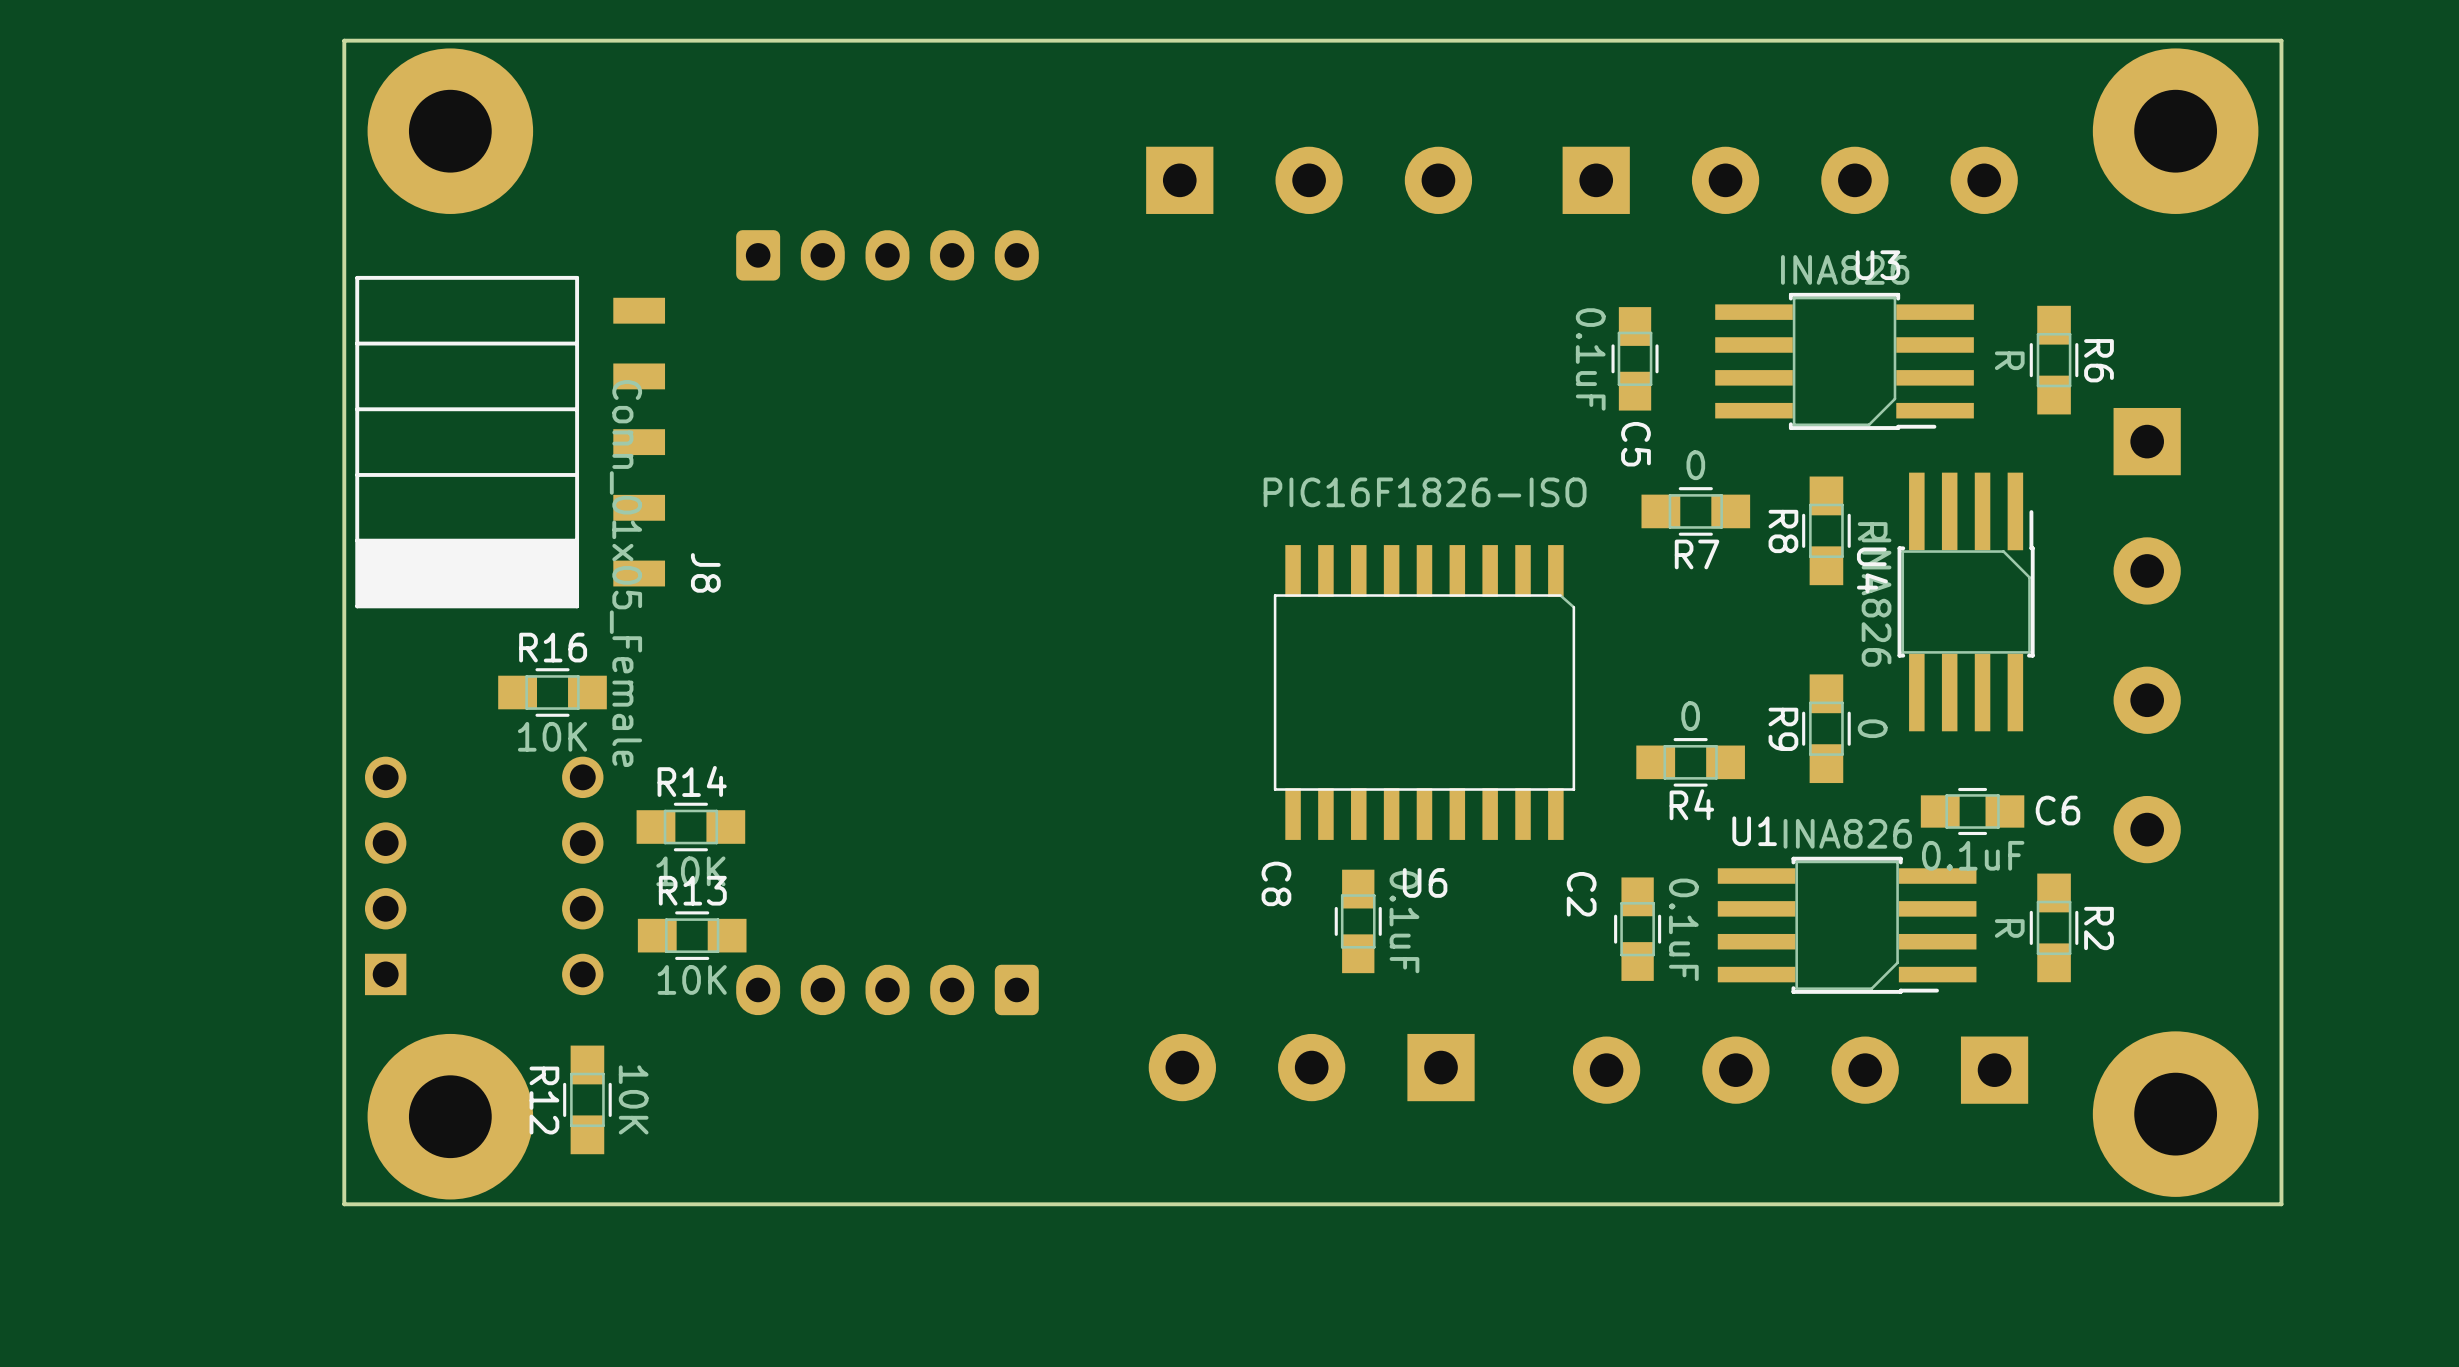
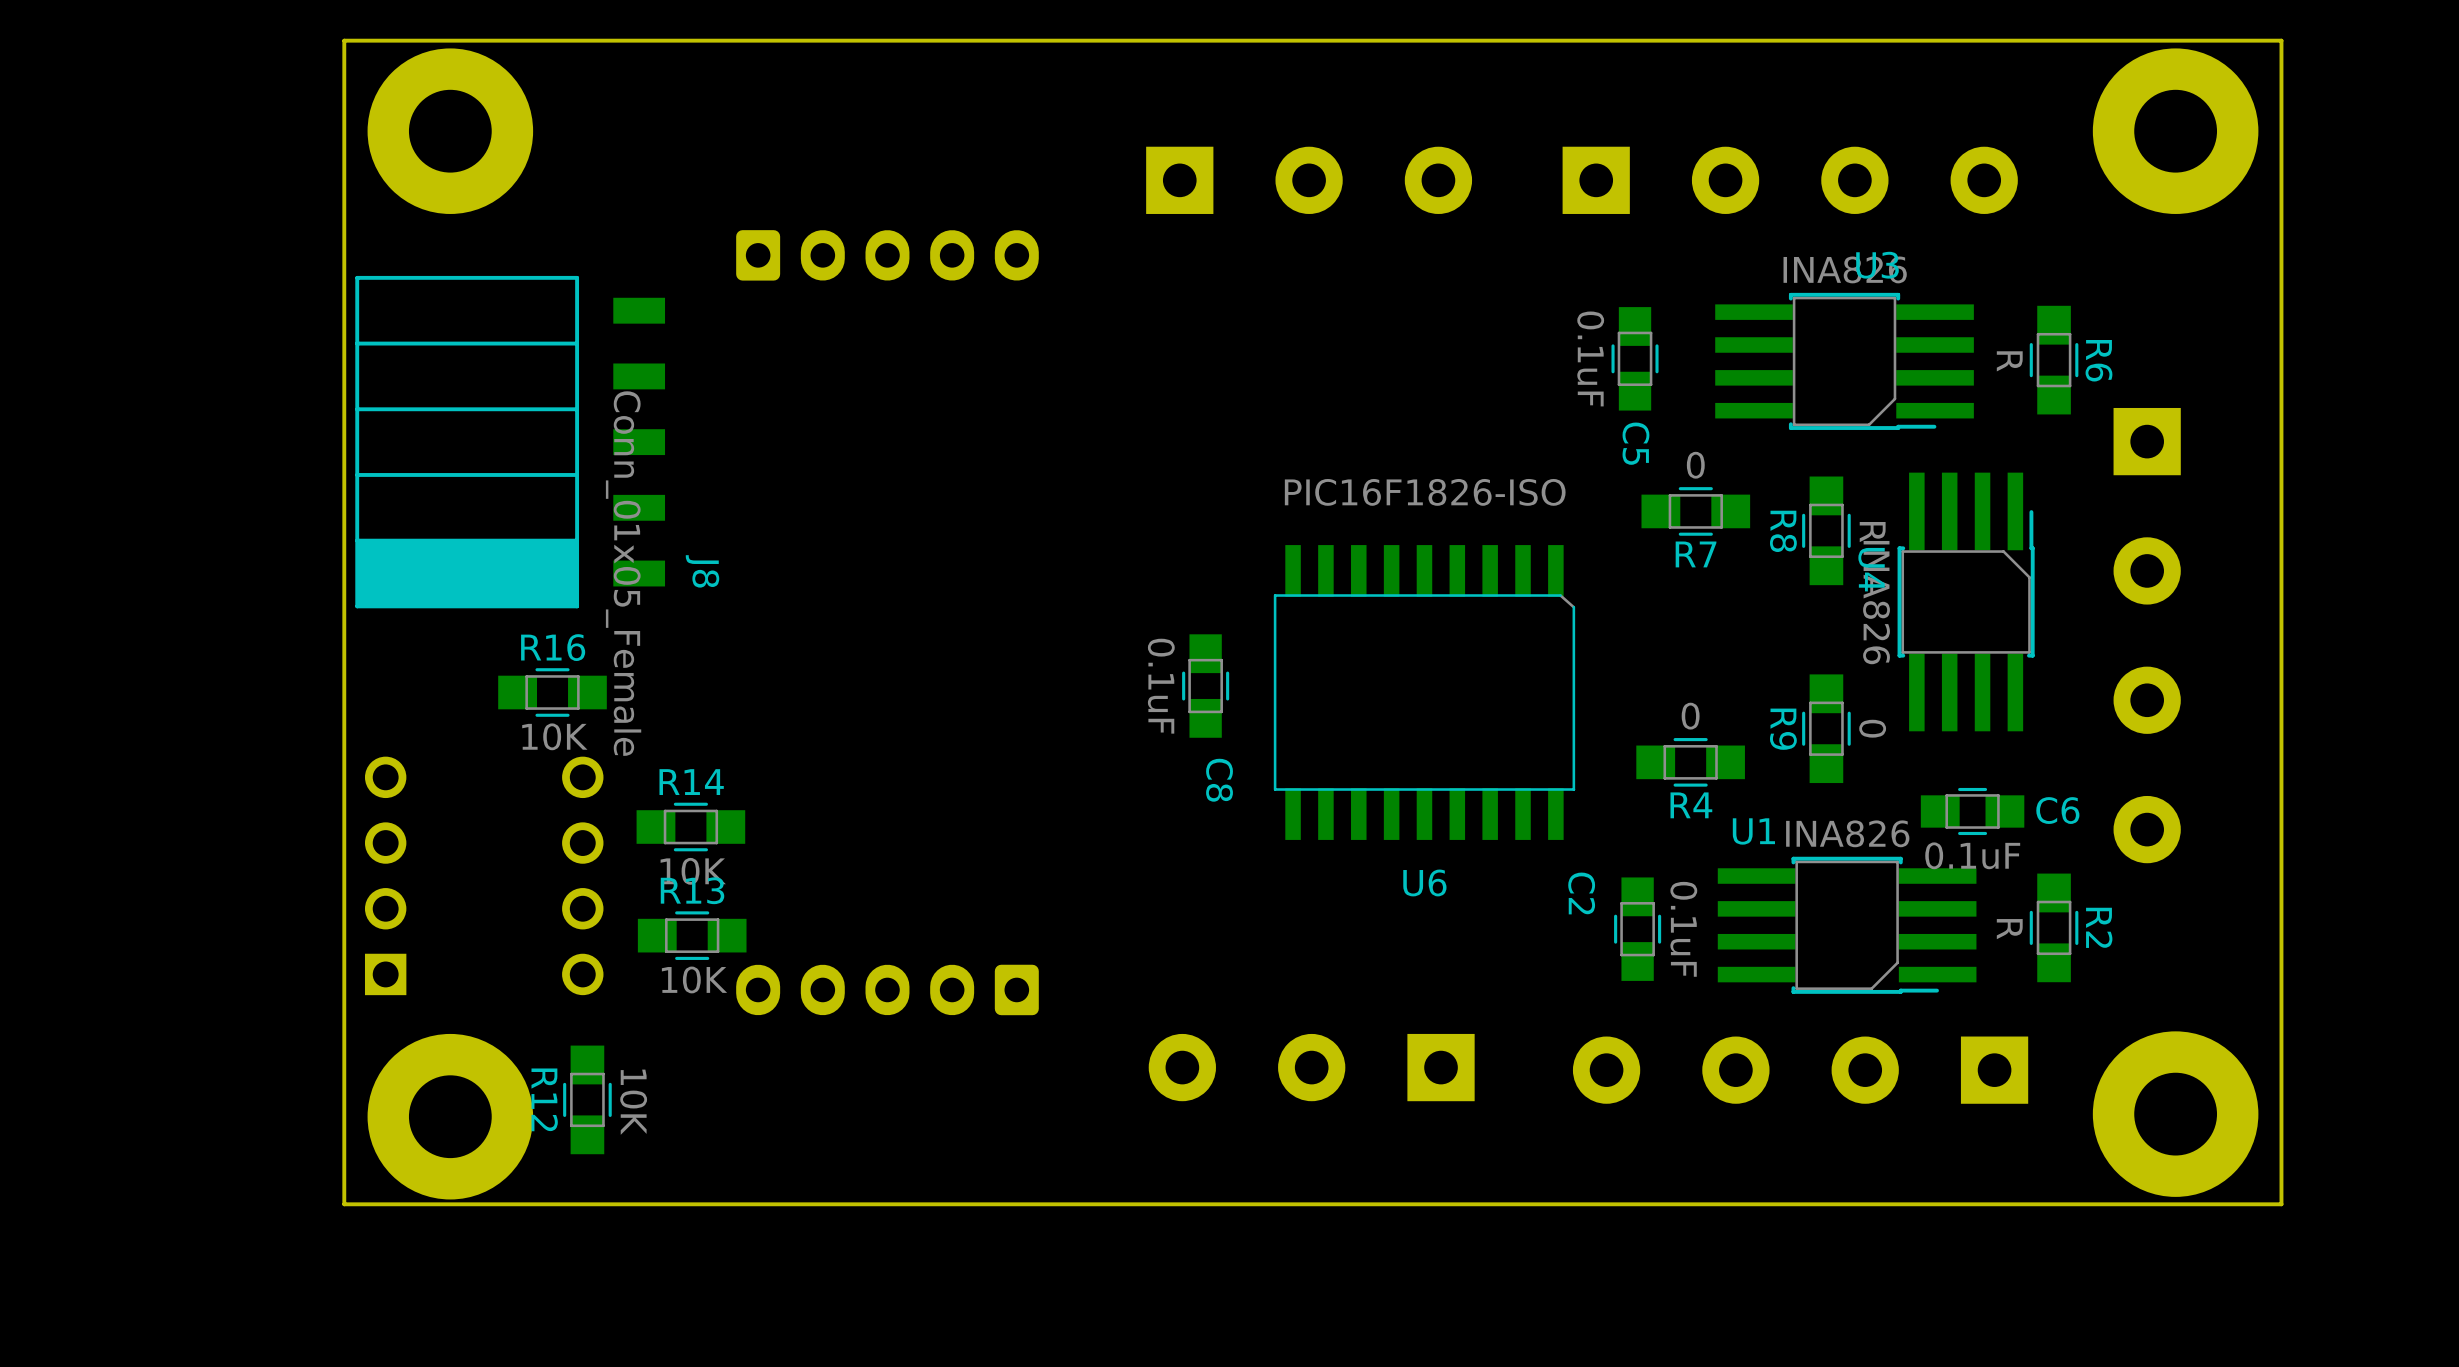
C8 name position: C8 (1276, 883) -> C8 (1219, 780)
C8 position: (1358, 921) -> (1205, 686)
C8 value position: 0.1uF (1404, 922) -> 0.1uF (1161, 686)

